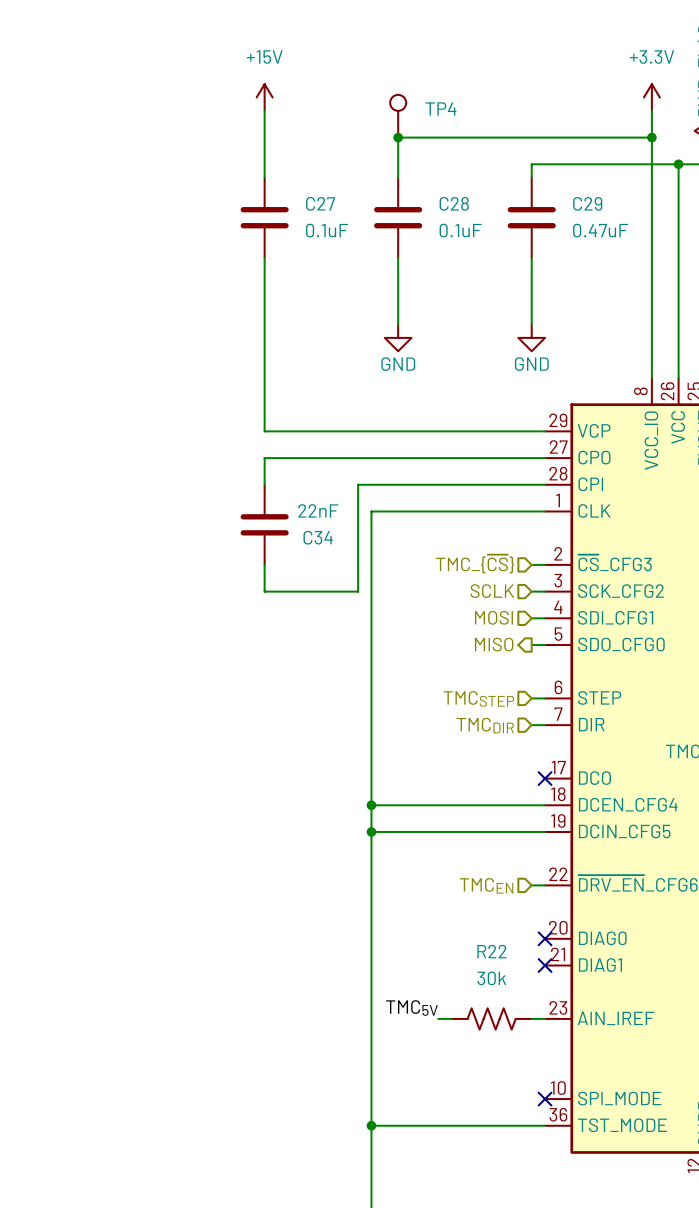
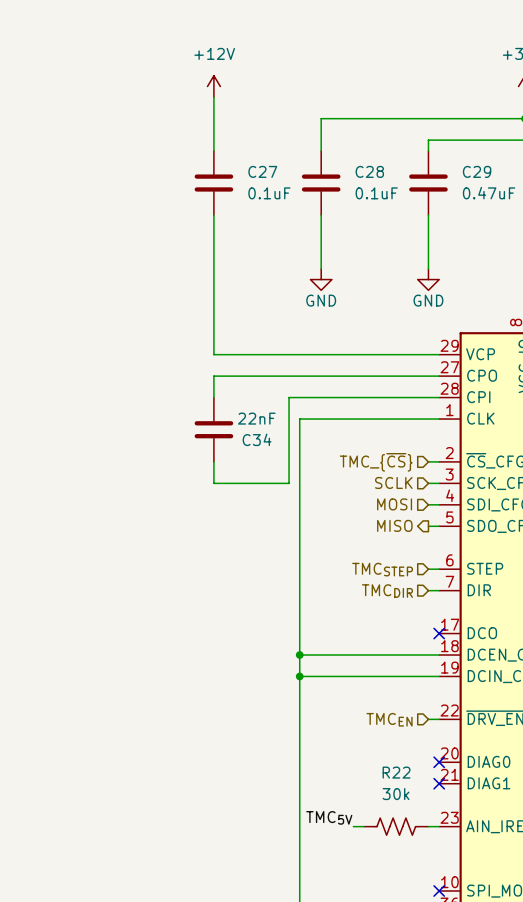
power symbol: +15V (264, 97) -> +12V (213, 86)
TP4: (398, 116) -> none
junction: (398, 137) -> none

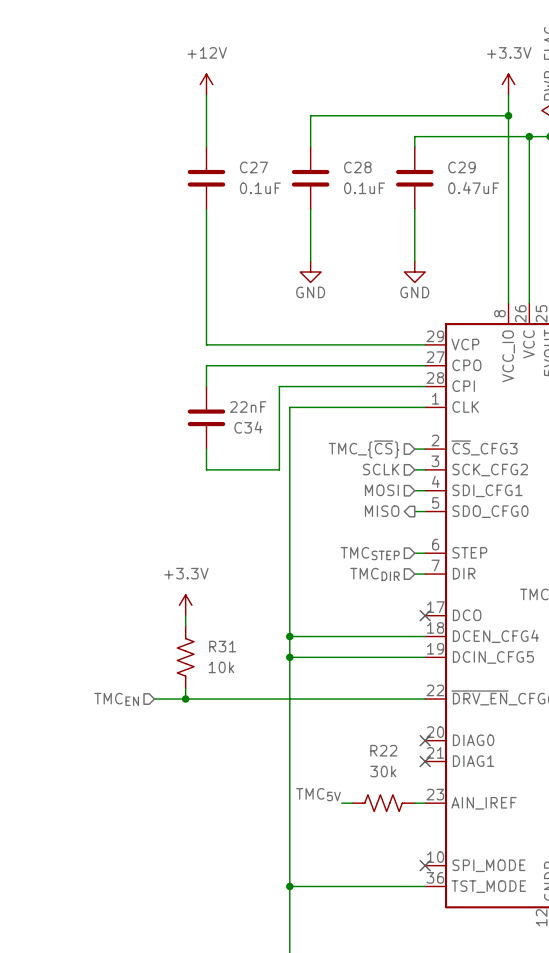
power symbol: none -> +3.3V (185, 605)
wire: none -> (185, 615) (185, 626)
R31: none -> 10k (185, 657)
wire: none -> (185, 688) (185, 699)
hierarchical label: none -> TMCEN (116, 699)
wire: none -> (154, 699) (414, 699)
junction: none -> (185, 699)
hierarchical label: TMCEN (389, 719) -> none

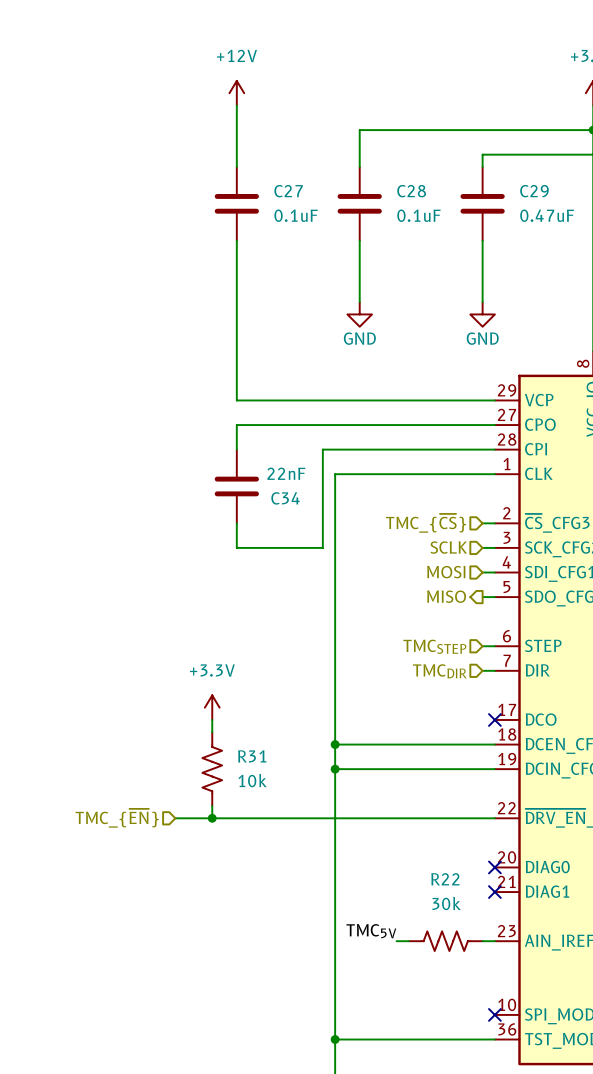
hierarchical label: TMCEN (116, 699) -> TMC_{~{EN}} (117, 818)

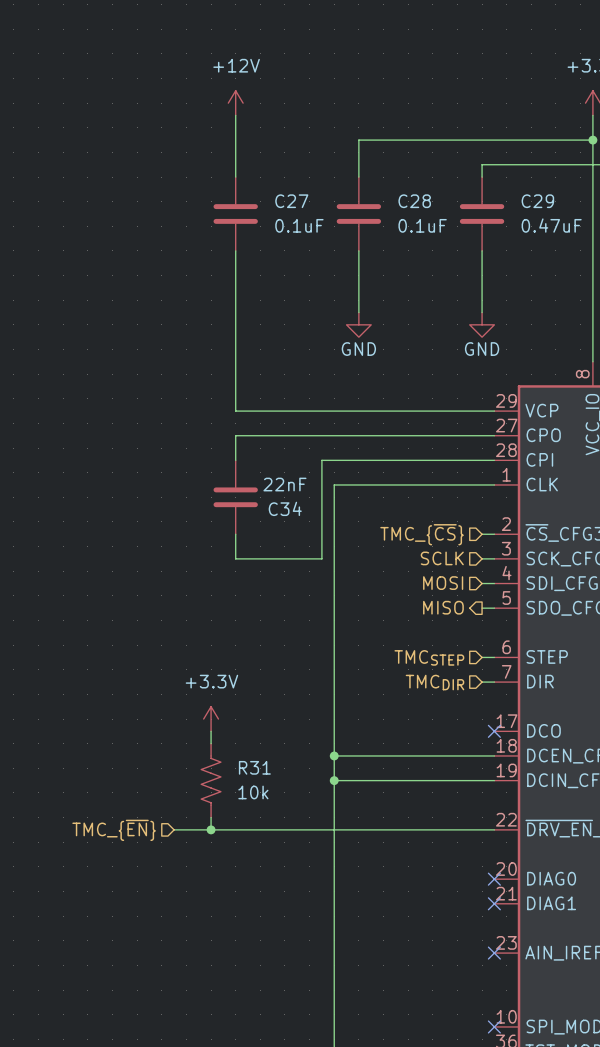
label: TMC5V (371, 931) -> none
wire: (396, 941) (408, 941) -> none
R22: 30k (445, 941) -> none
wire: (482, 941) (494, 941) -> none
no-connect mark: none -> (494, 953)

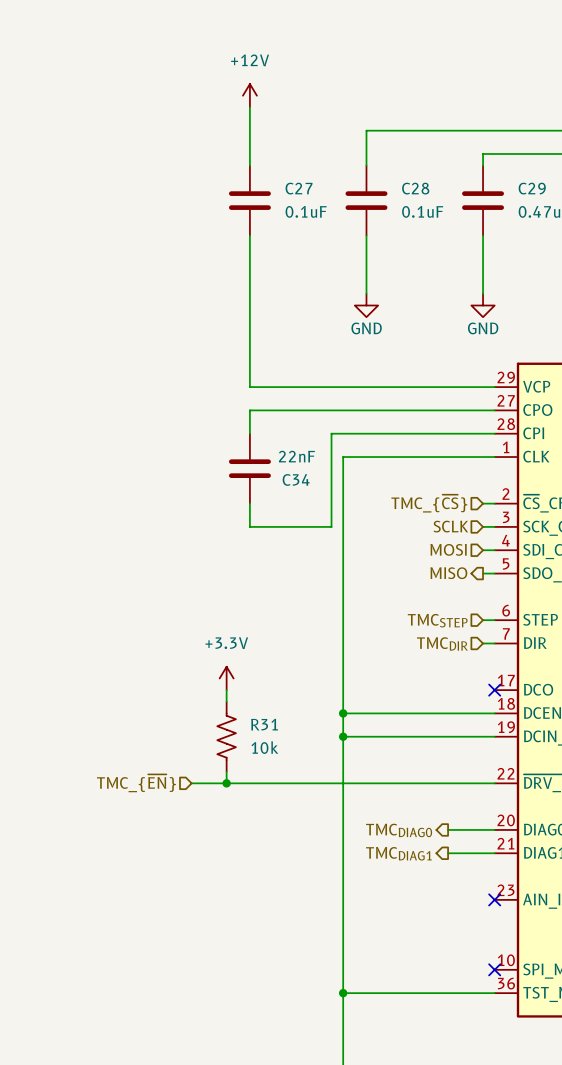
hierarchical label: none -> TMCDIAG0 (399, 830)
wire: none -> (448, 829) (494, 829)
no-connect mark: (494, 879) -> none
wire: none -> (448, 853) (494, 853)
no-connect mark: (494, 903) -> none
hierarchical label: none -> TMCDIAG1 (398, 853)

